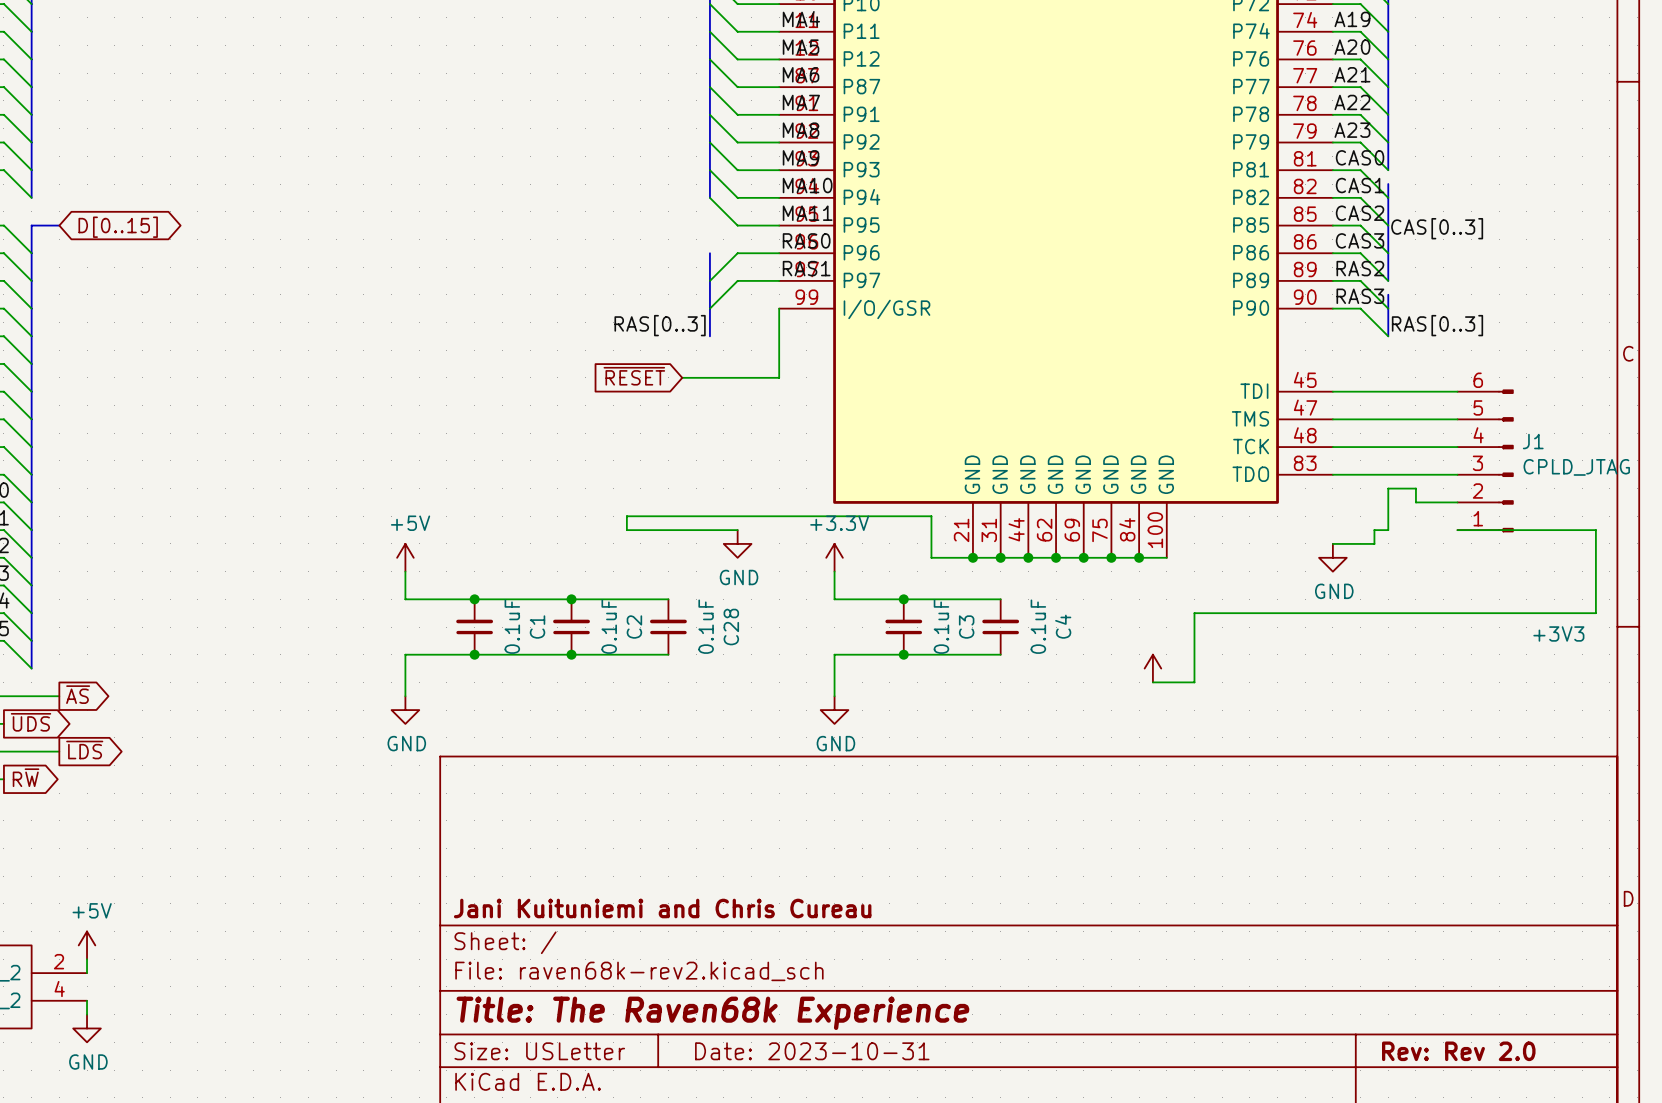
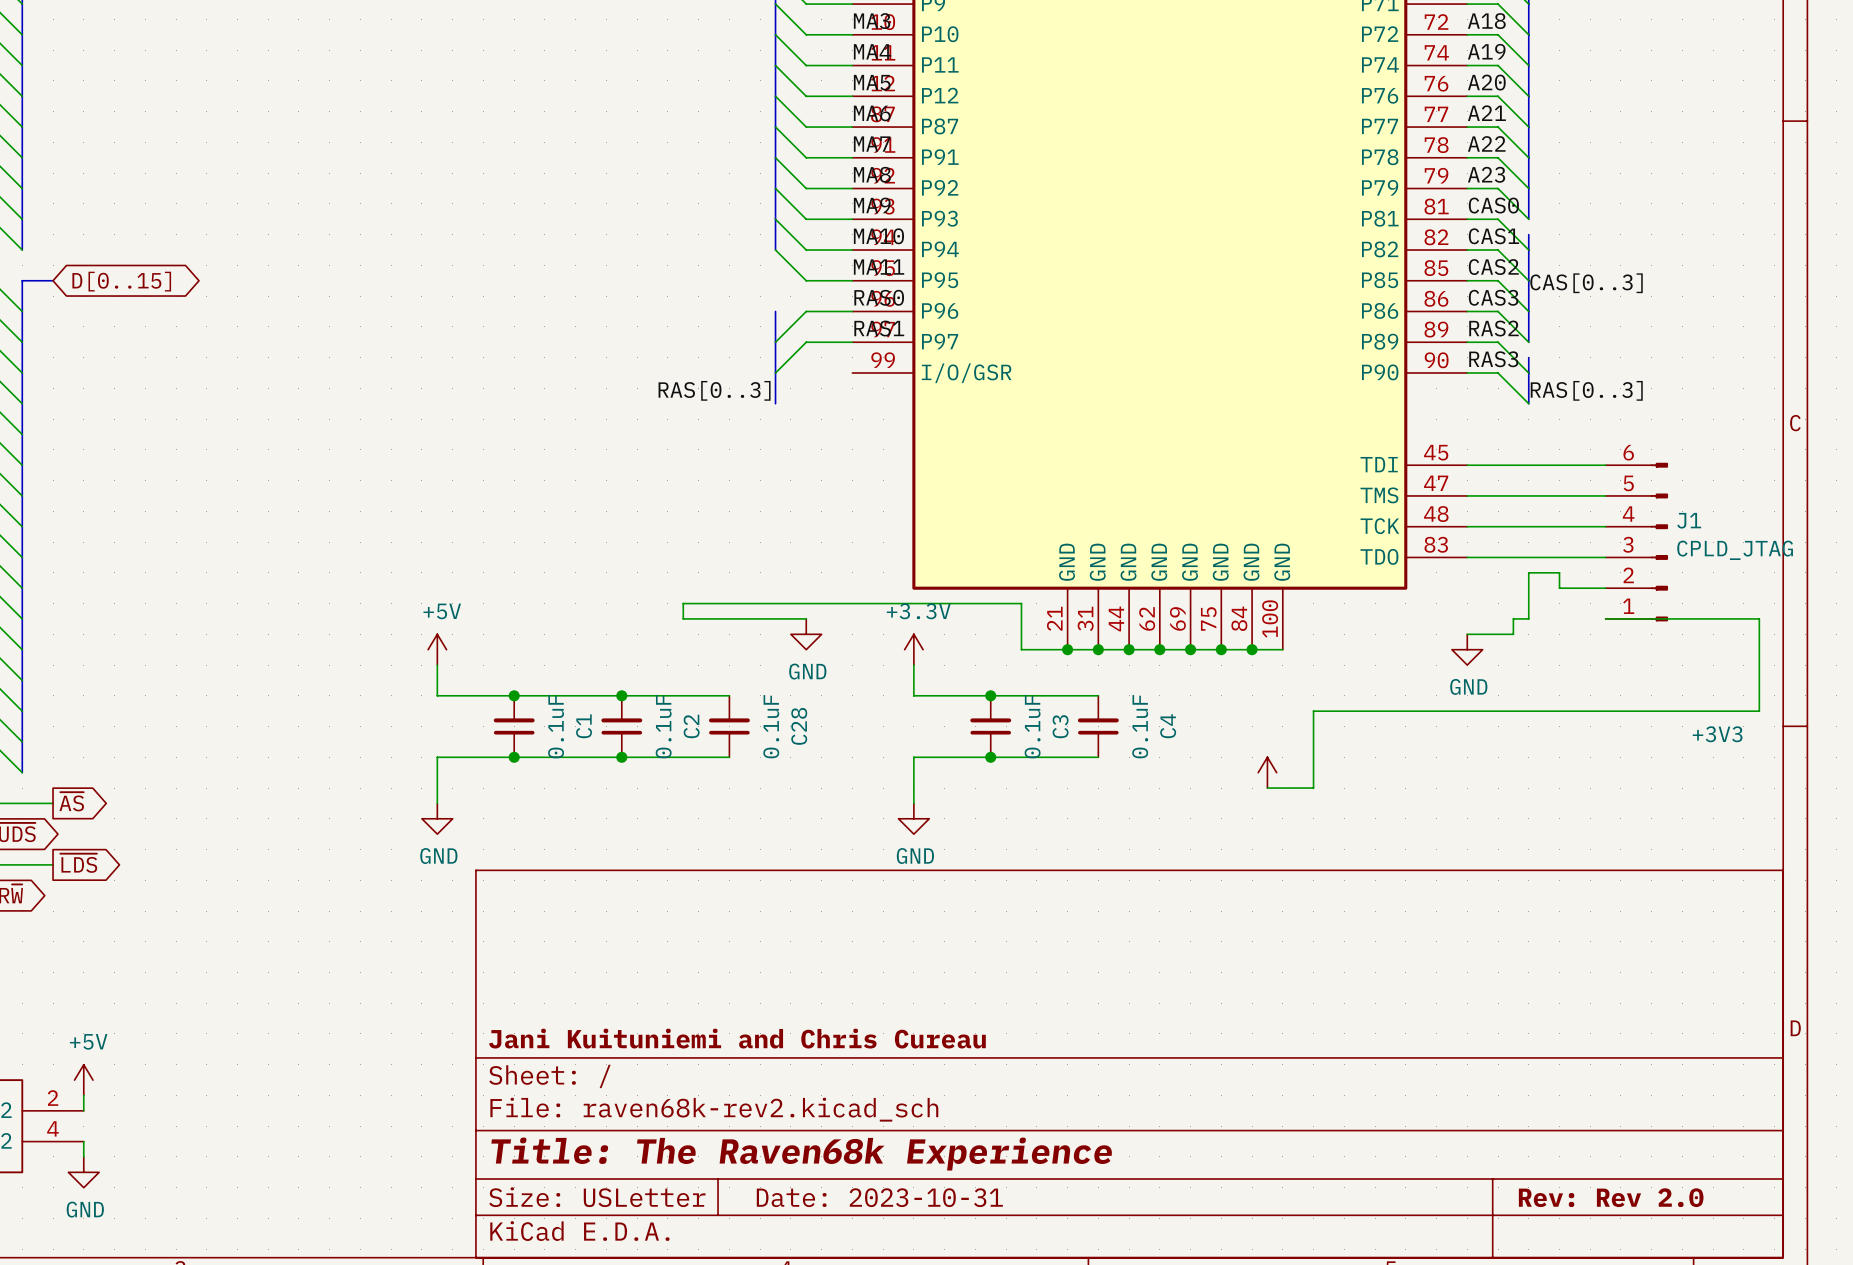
wire: (779, 308) (779, 377) (682, 377) -> none
global label: ~{RESET} (634, 376) -> none

